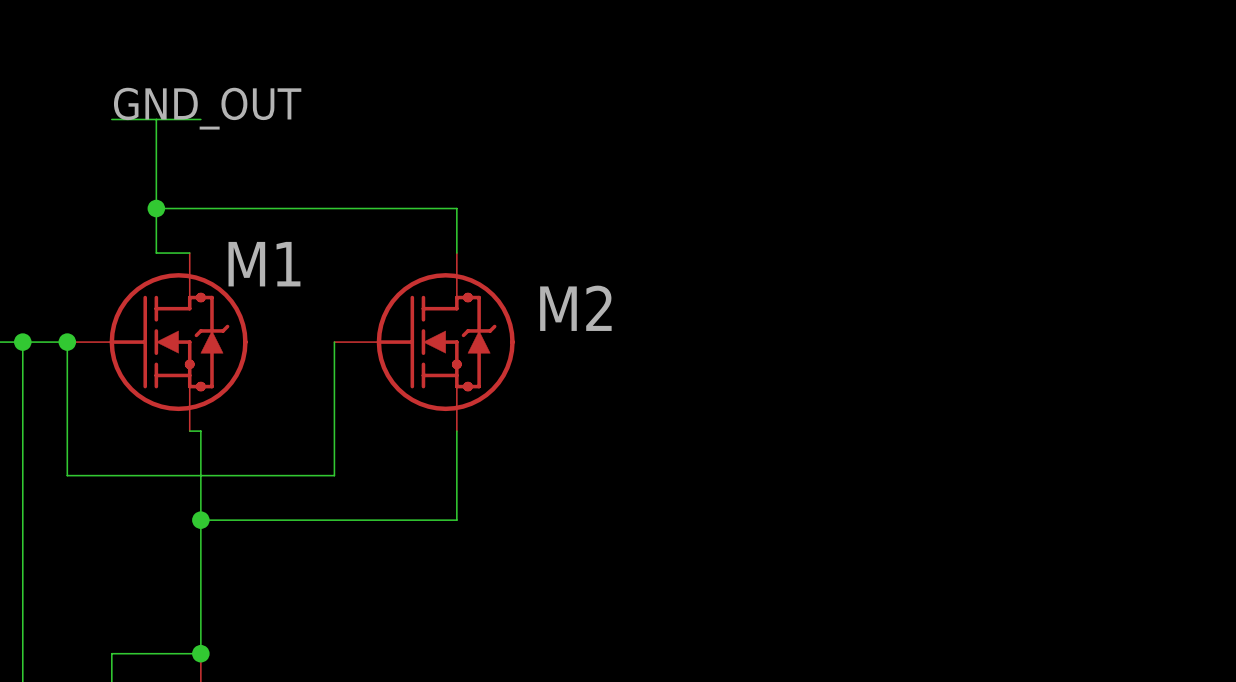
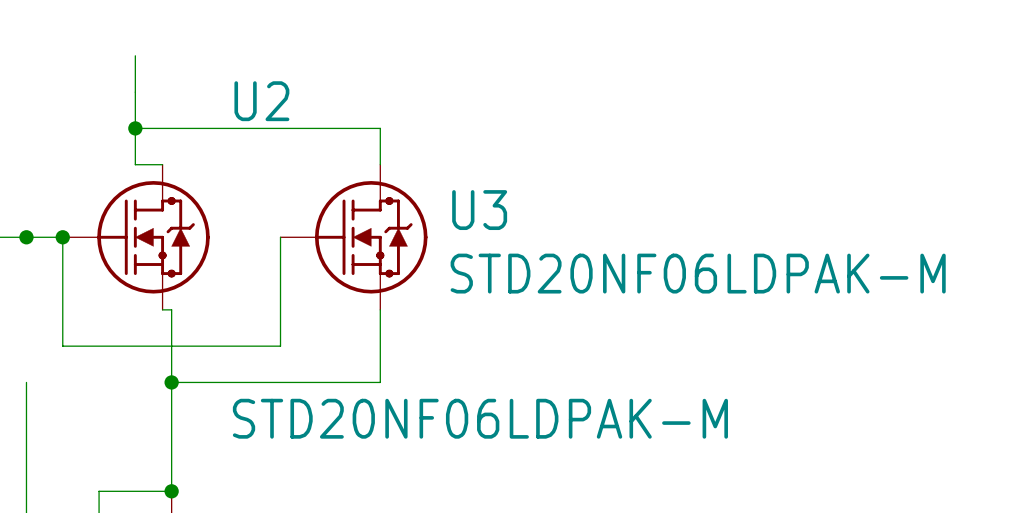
label: GND_OUT (207, 108) -> none
wire: (111, 119) (200, 119) -> none
M1 name: M1 (264, 264) -> U2 (261, 101)
M2 name: M2 (575, 308) -> U3 (479, 210)
wire: (22, 342) (22, 520) -> none
M2 value: none -> STD20NF06LDPAK-M (698, 273)
M1 value: none -> STD20NF06LDPAK-M (480, 418)

